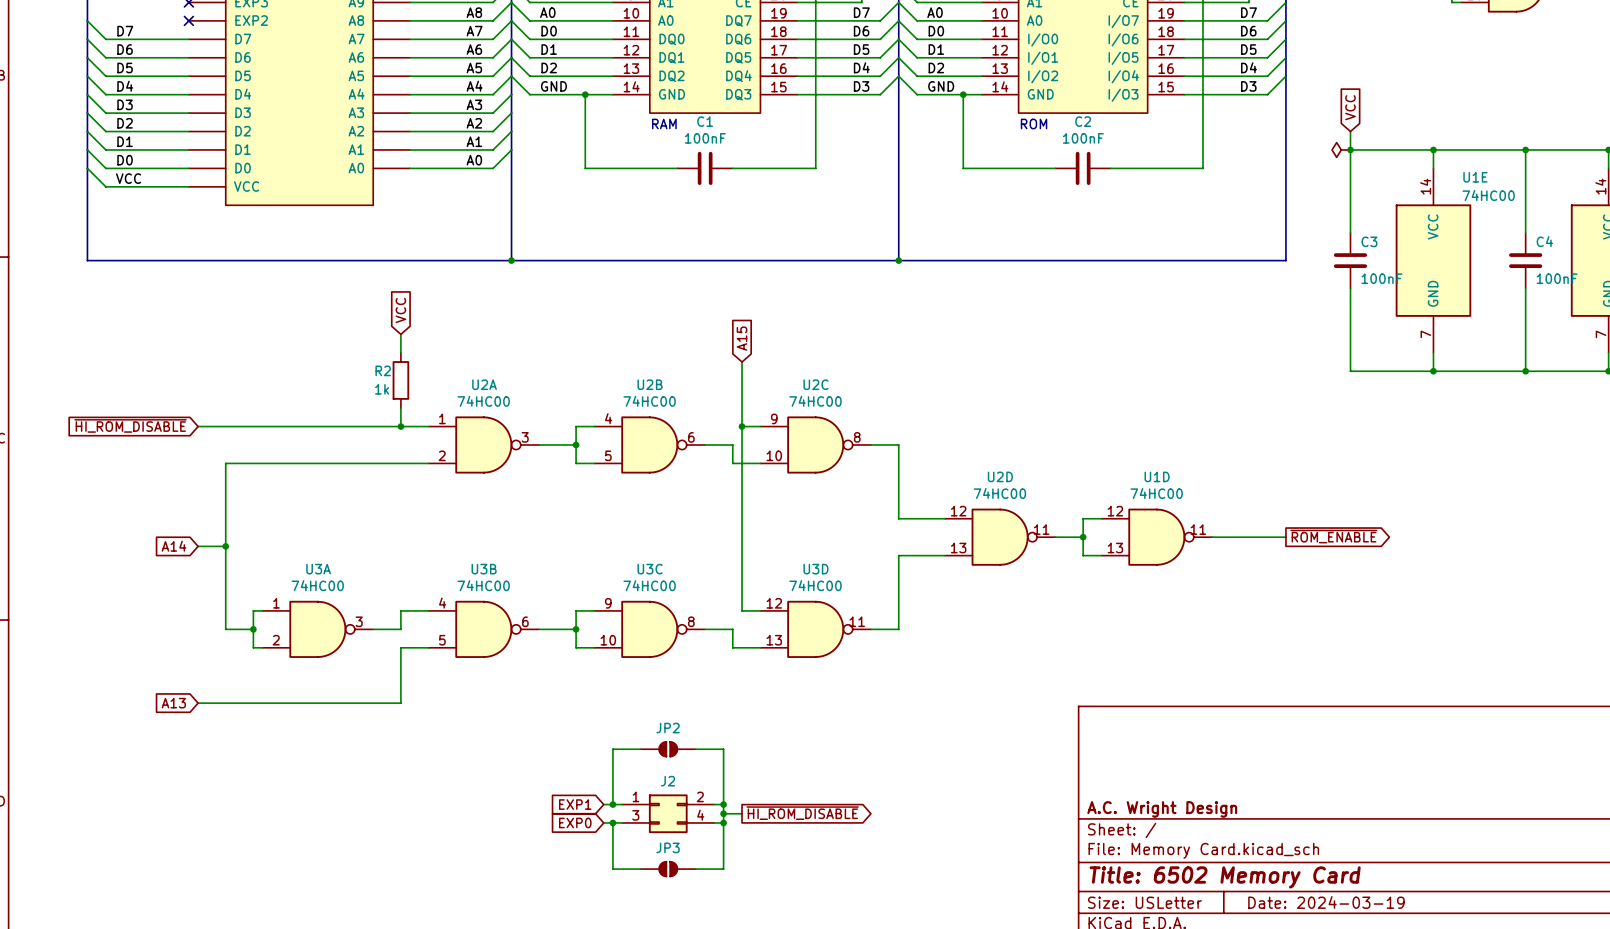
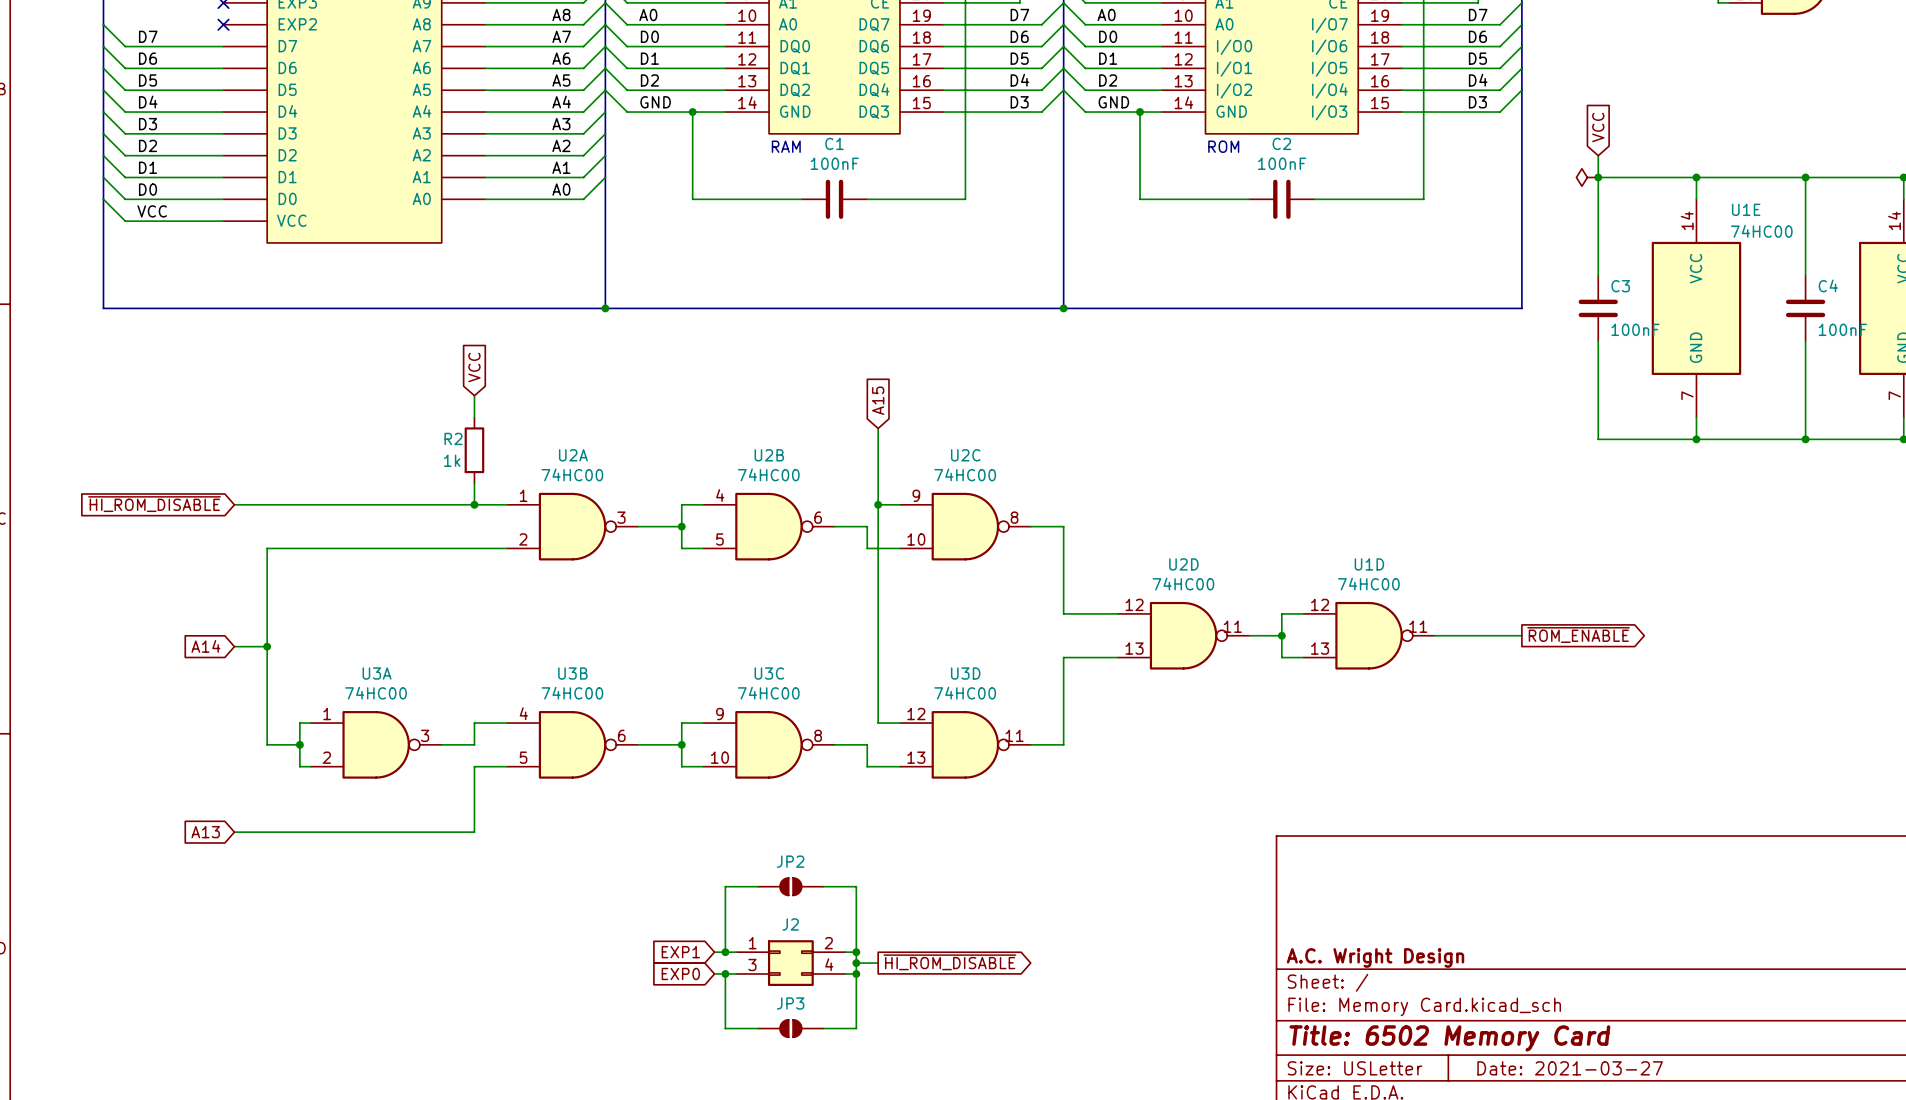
title block: Date: 2024-03-19 (1326, 902) -> Date: 2021-03-27 (1570, 1068)

